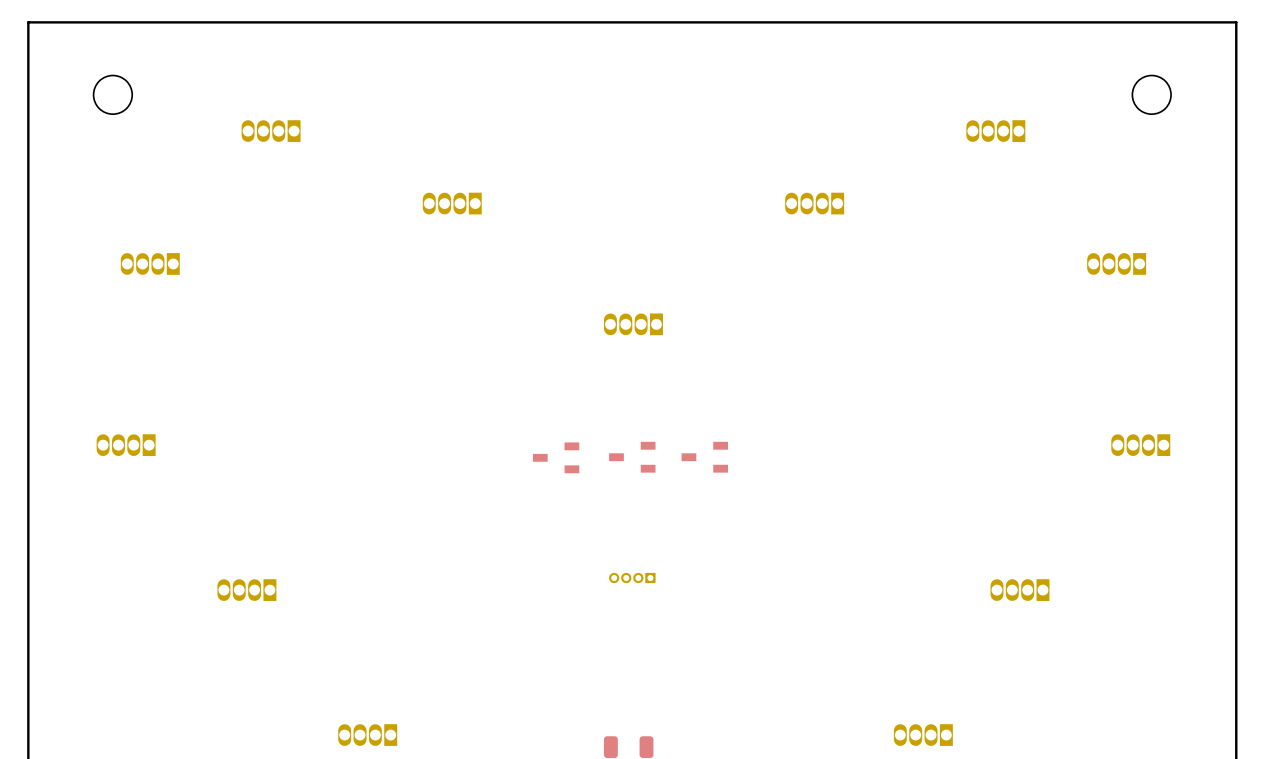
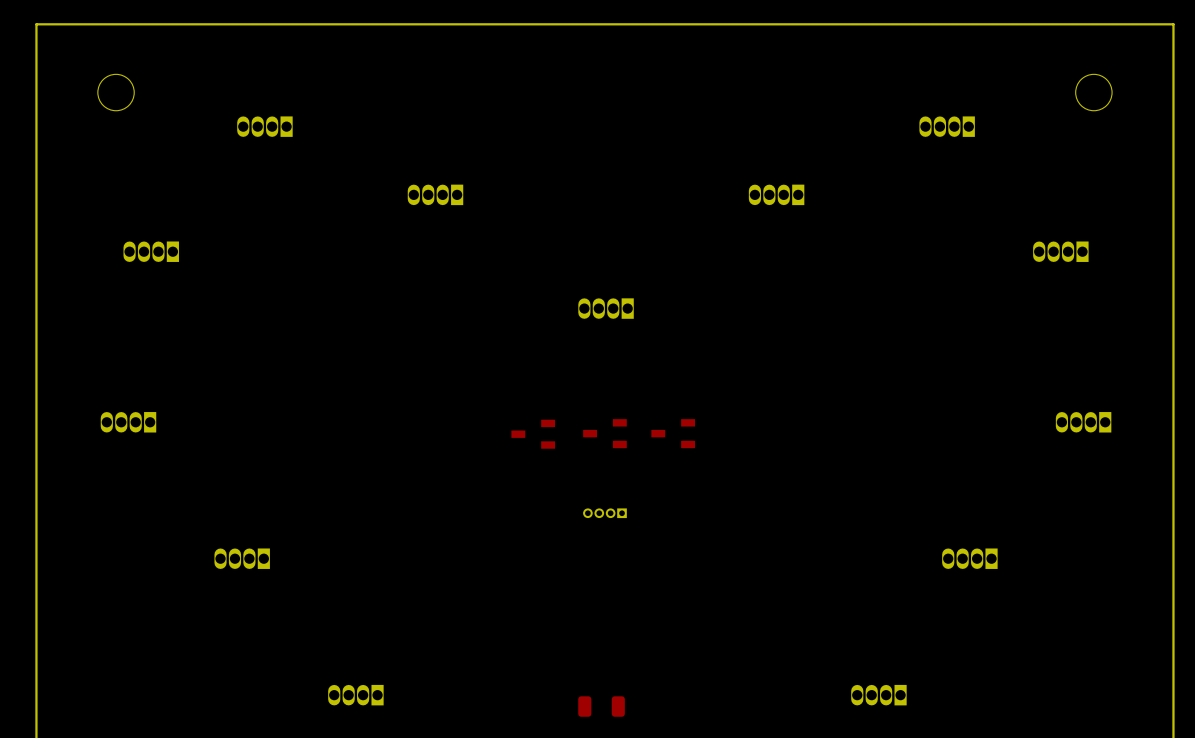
part position: (632, 578) -> (604, 513)

